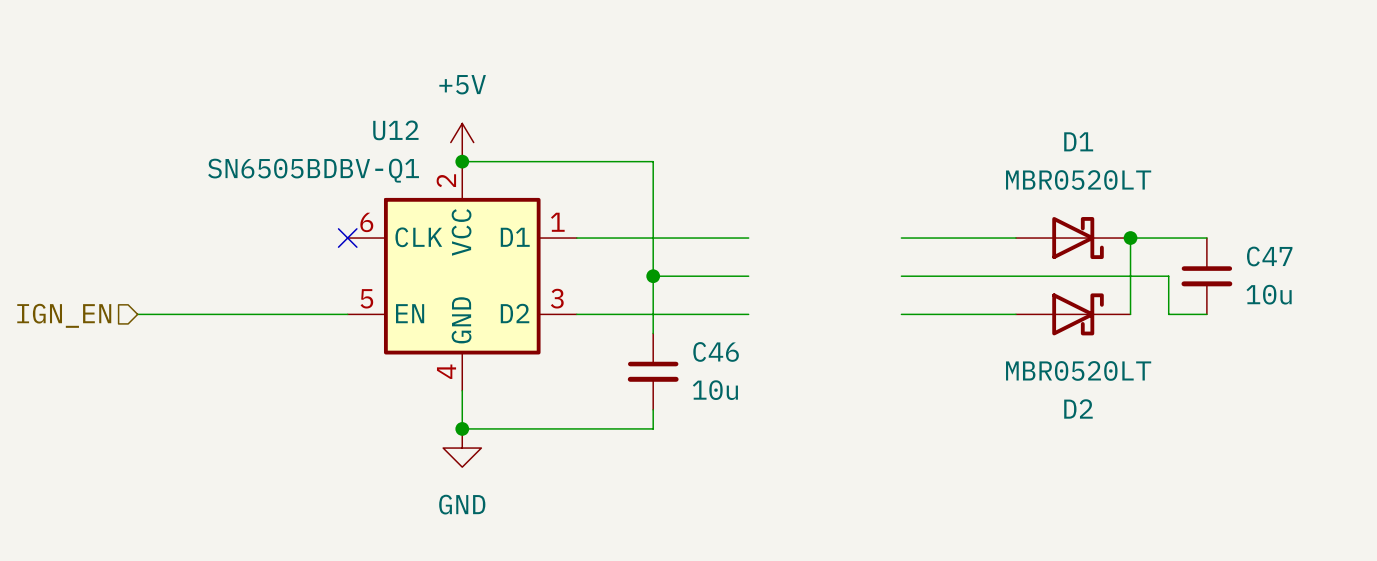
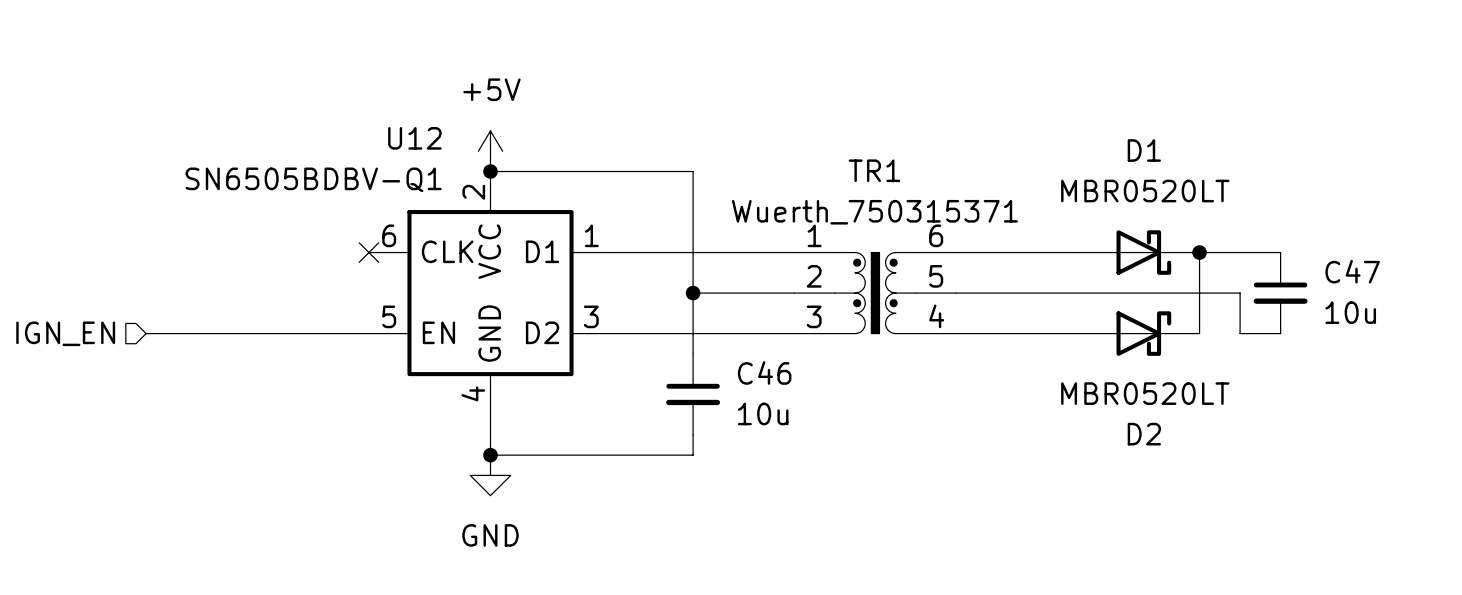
TR1: none -> Wuerth_750315371 (875, 293)

